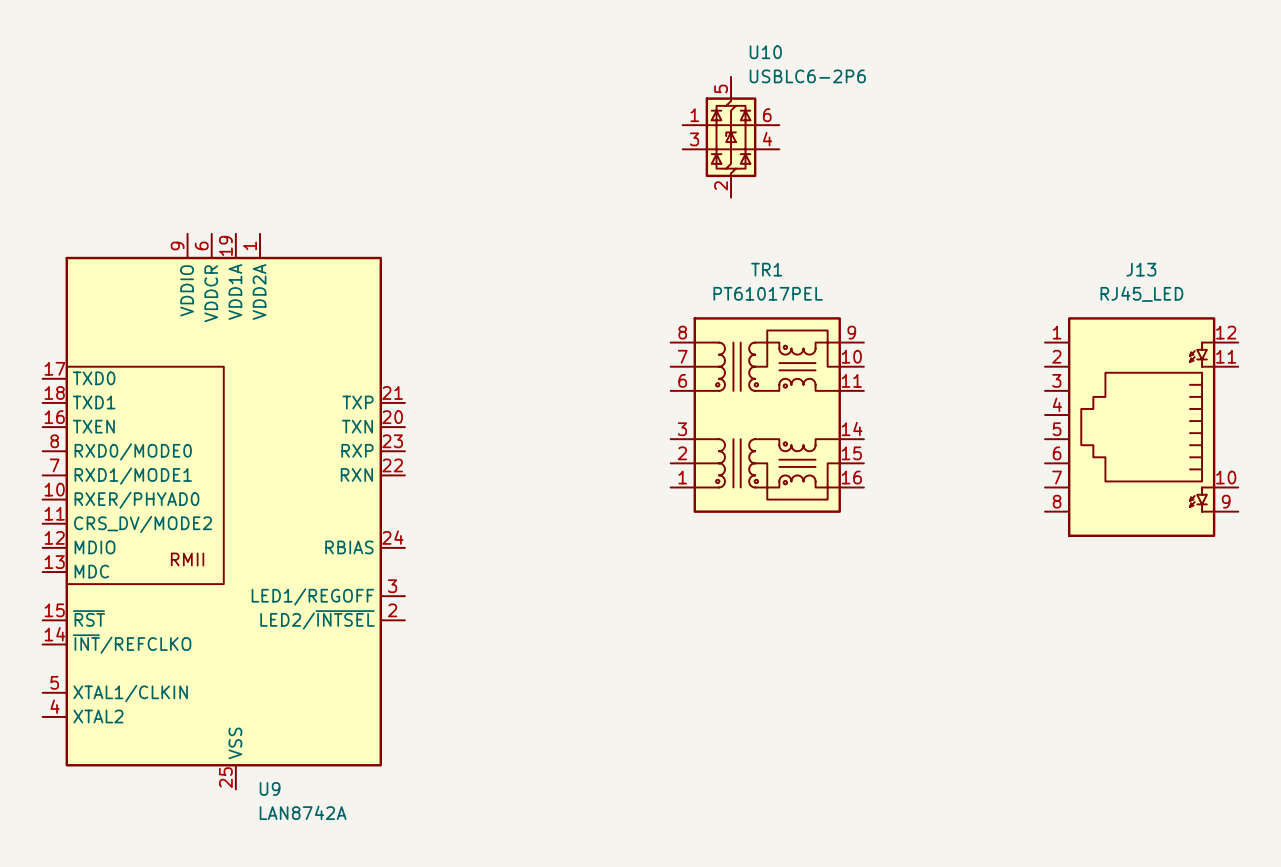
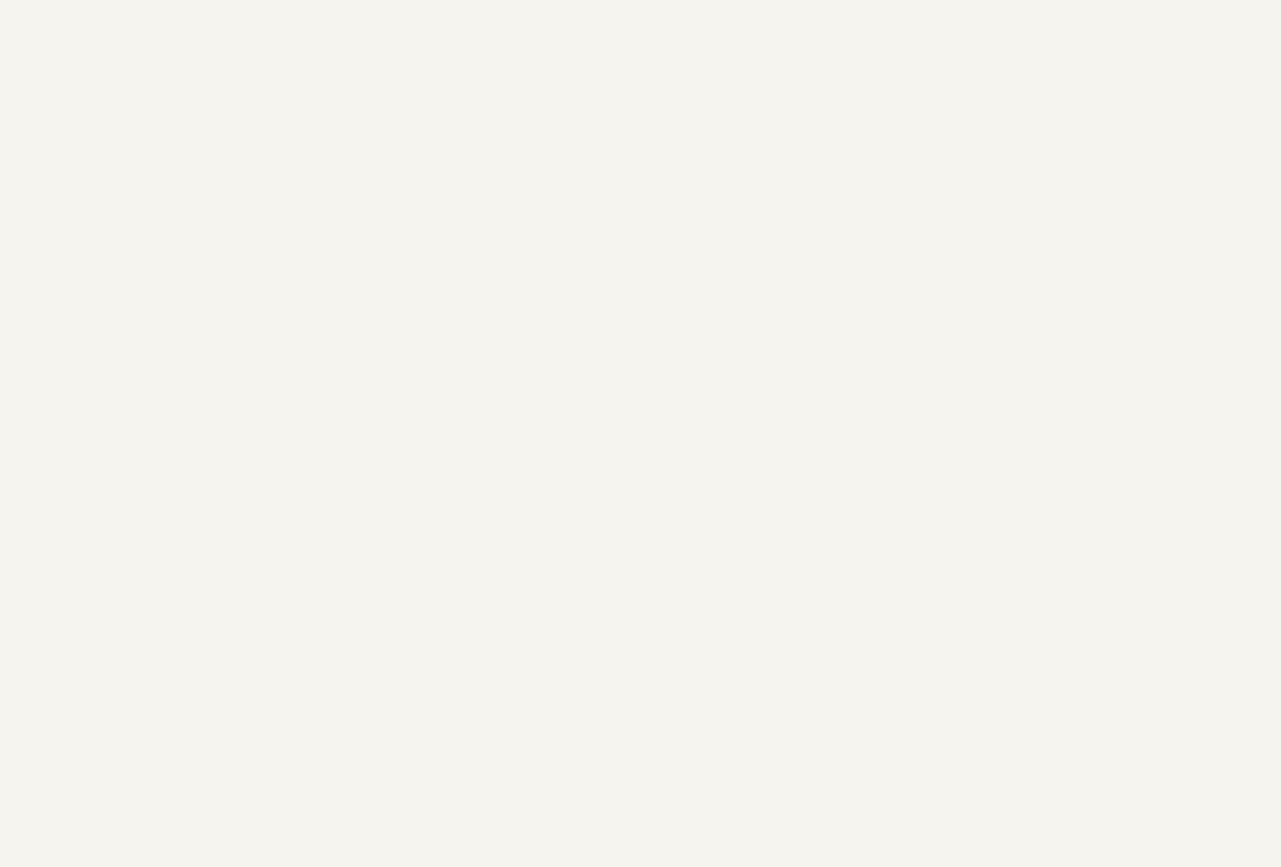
U10: USBLC6-2P6 (731, 137) -> none
TR1: PT61017PEL (767, 415) -> none
J13: RJ45_LED (1141, 427) -> none
U9: LAN8742A (223, 511) -> none

